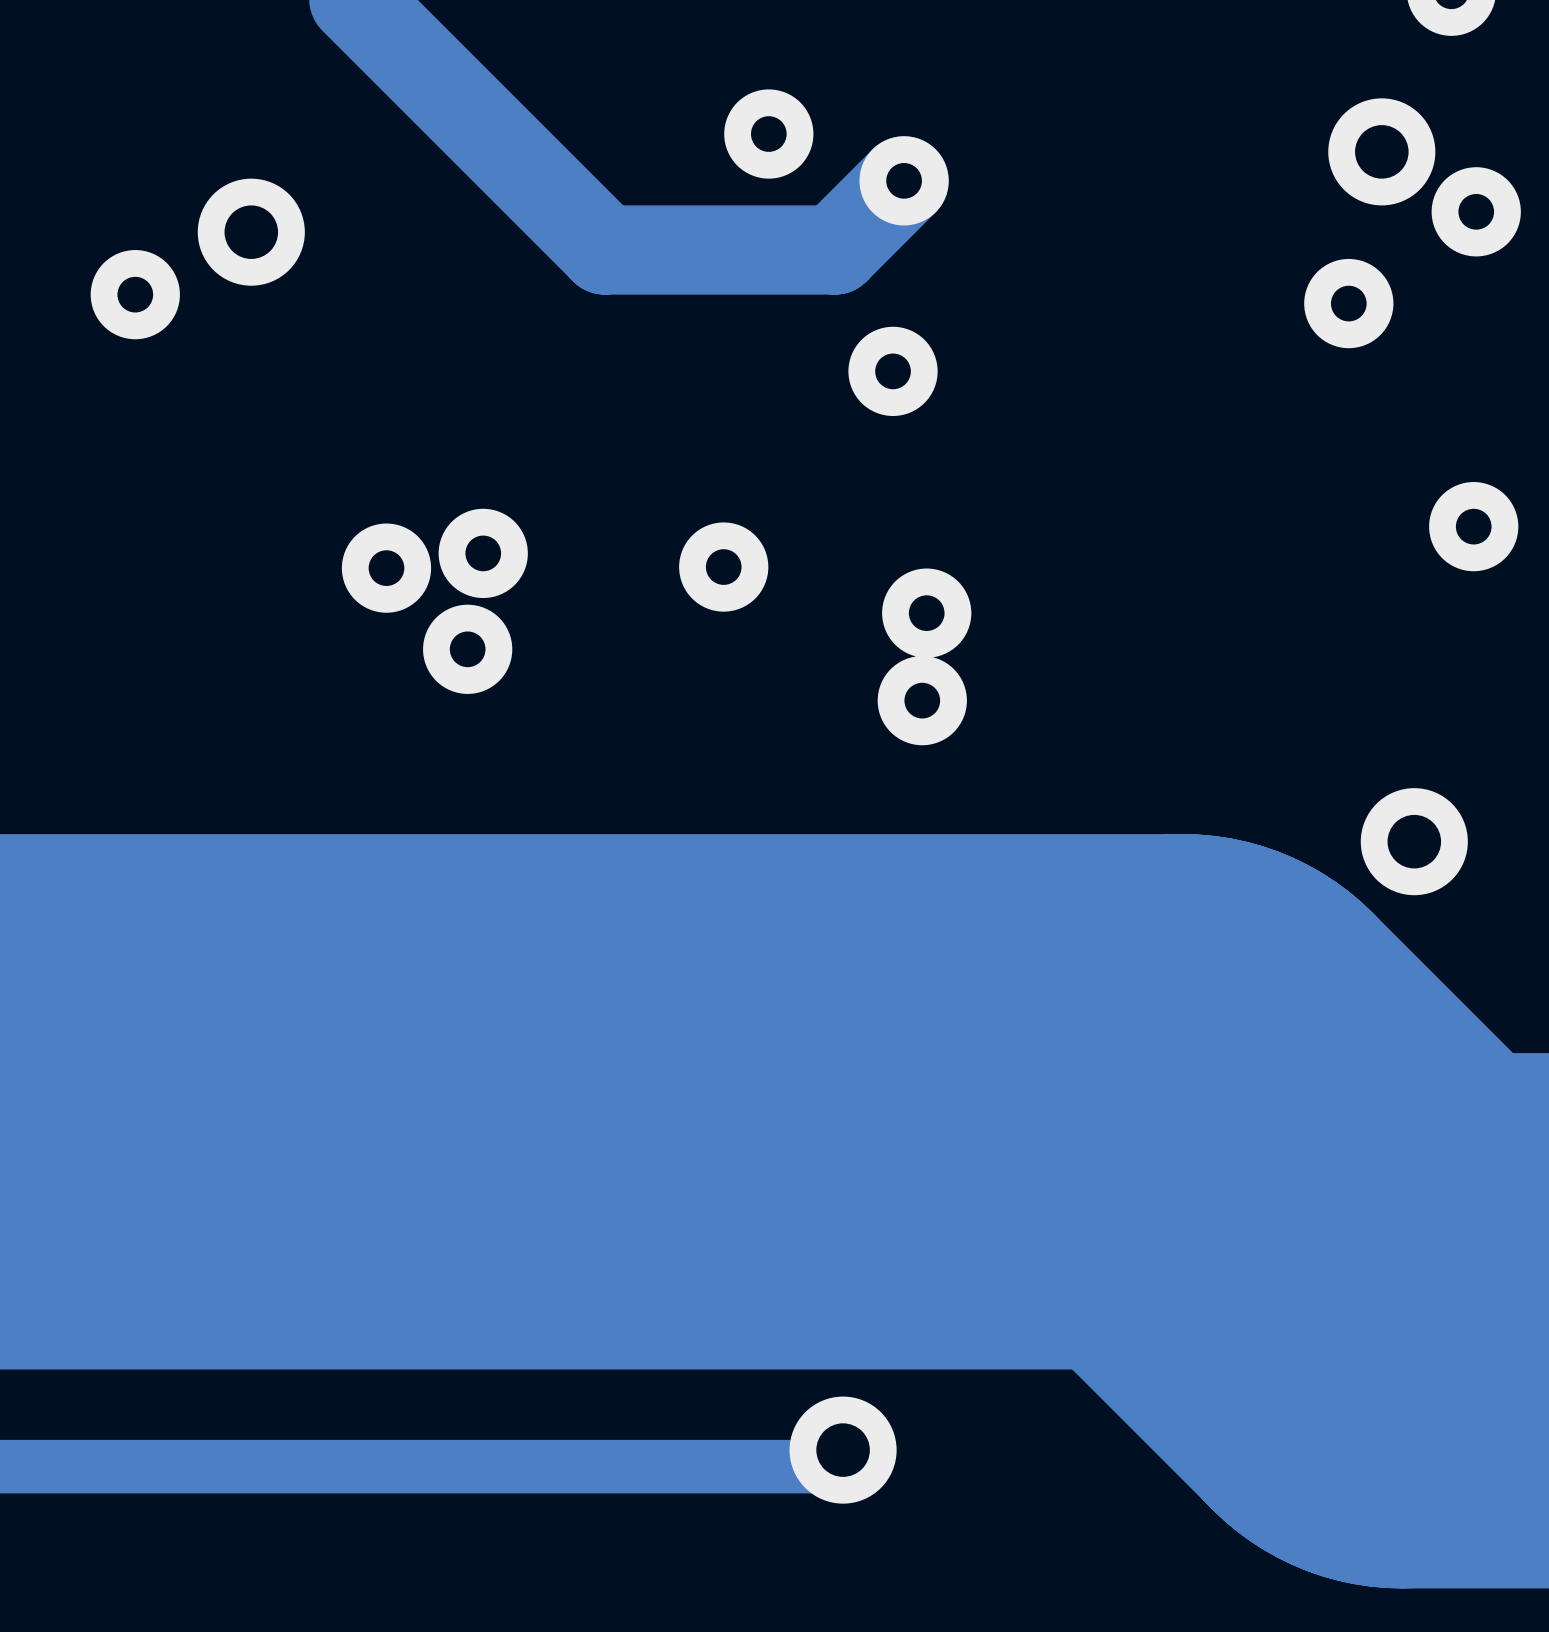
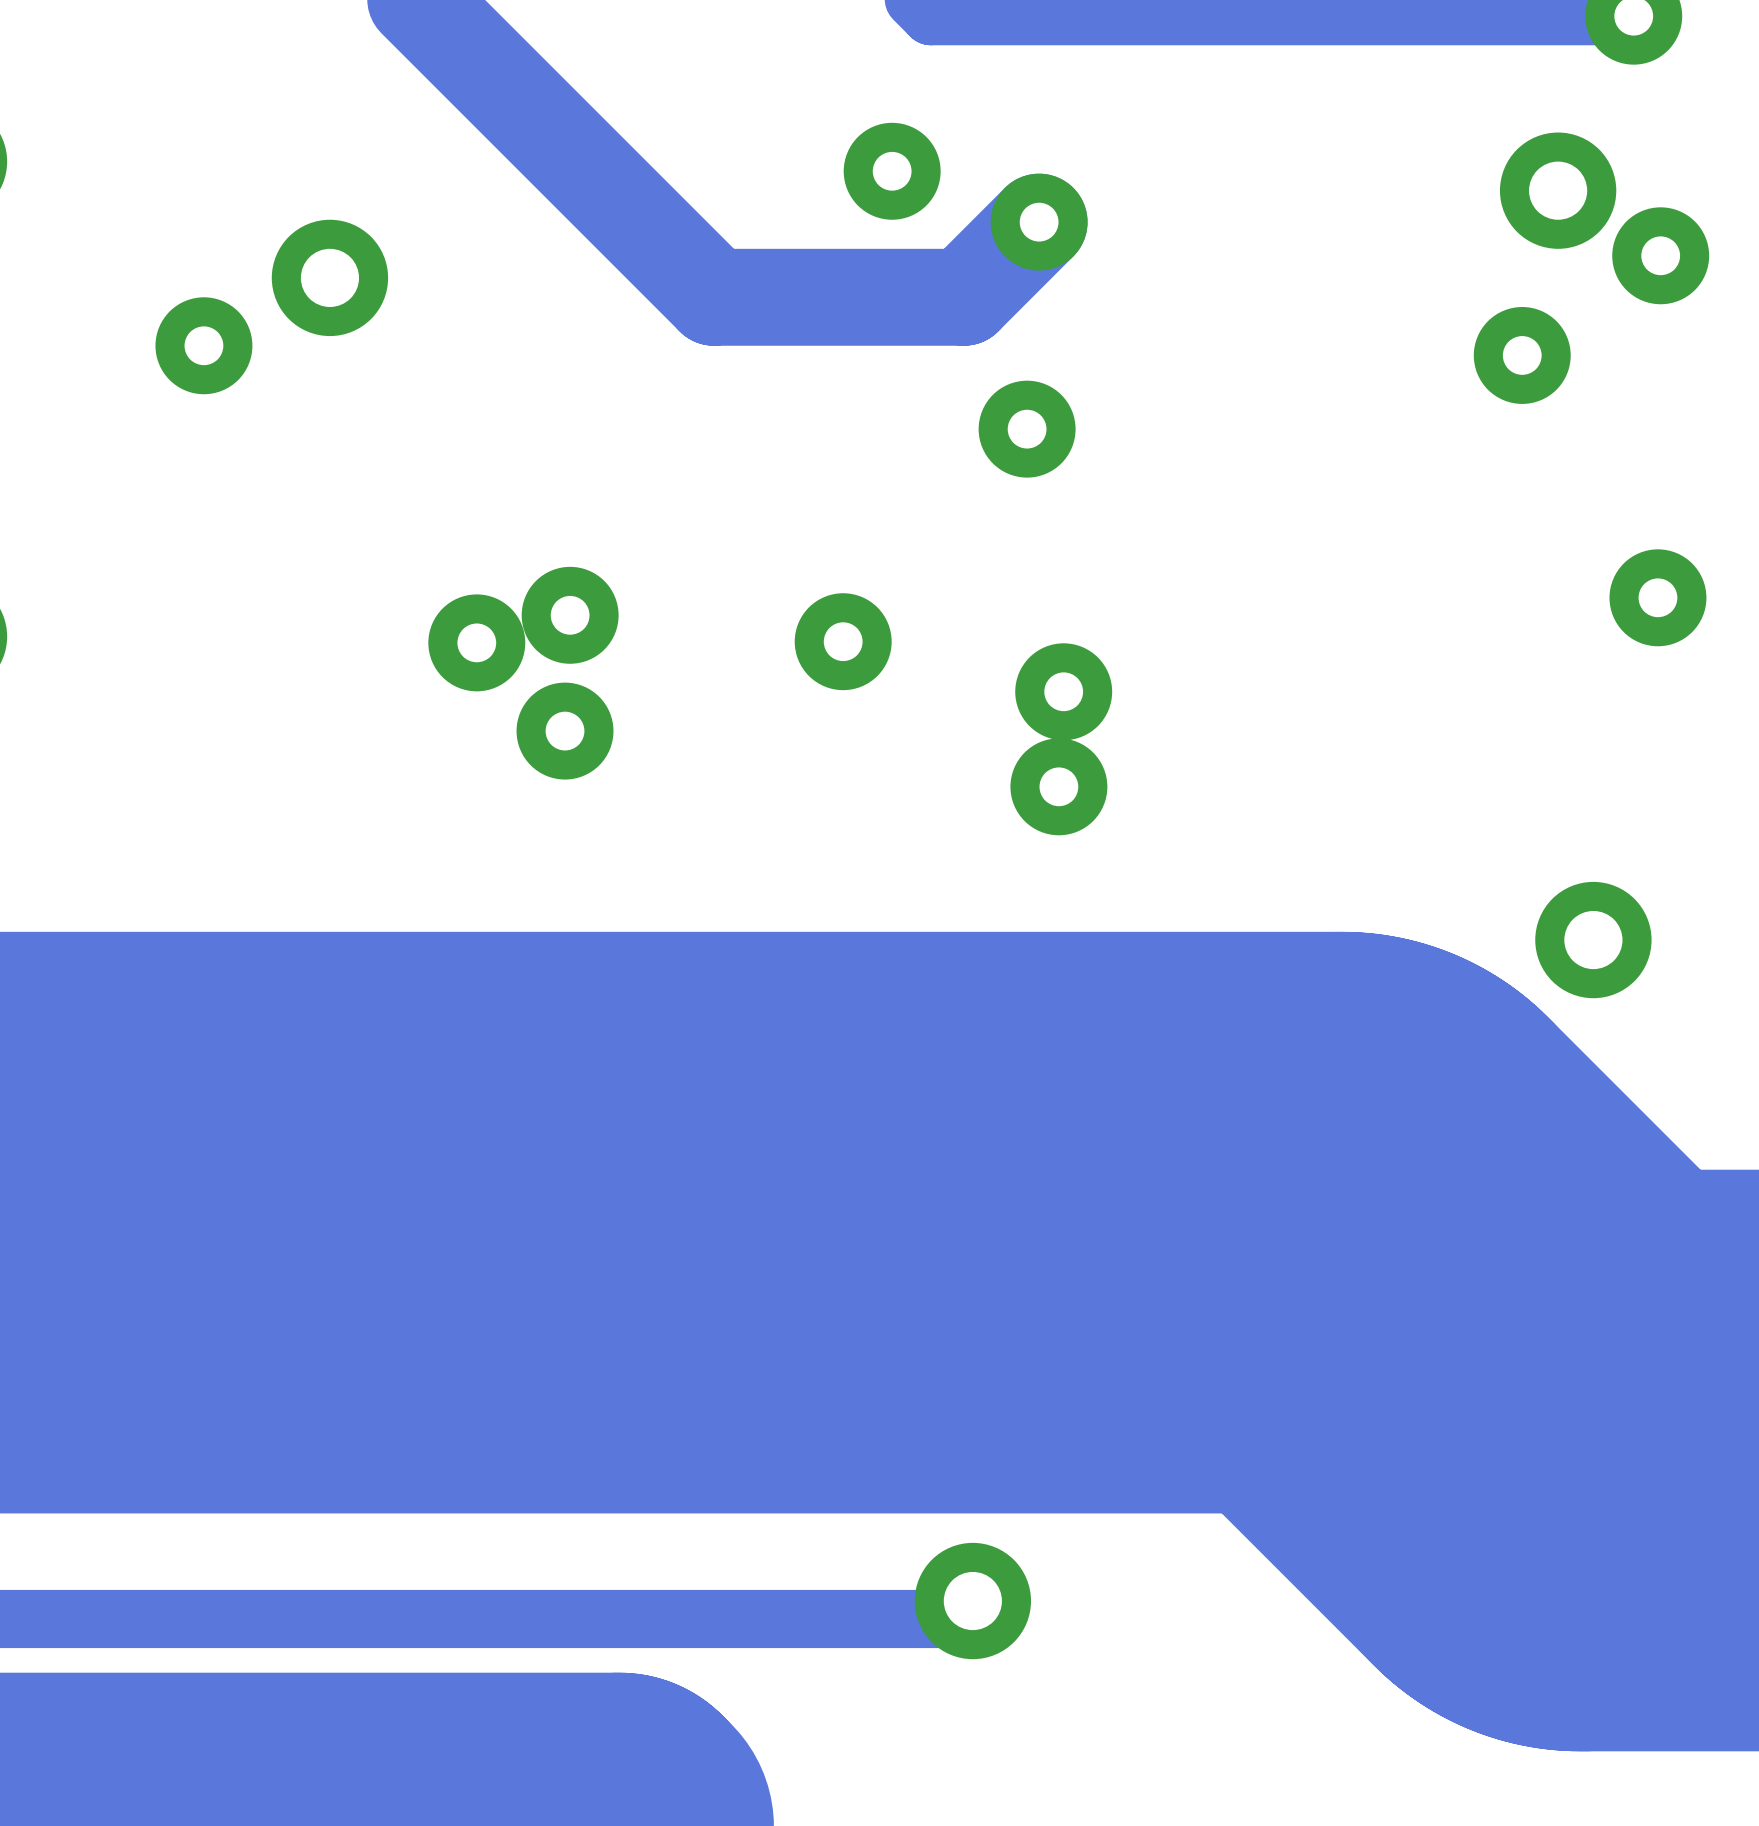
via position: (483, 553) -> (570, 615)

